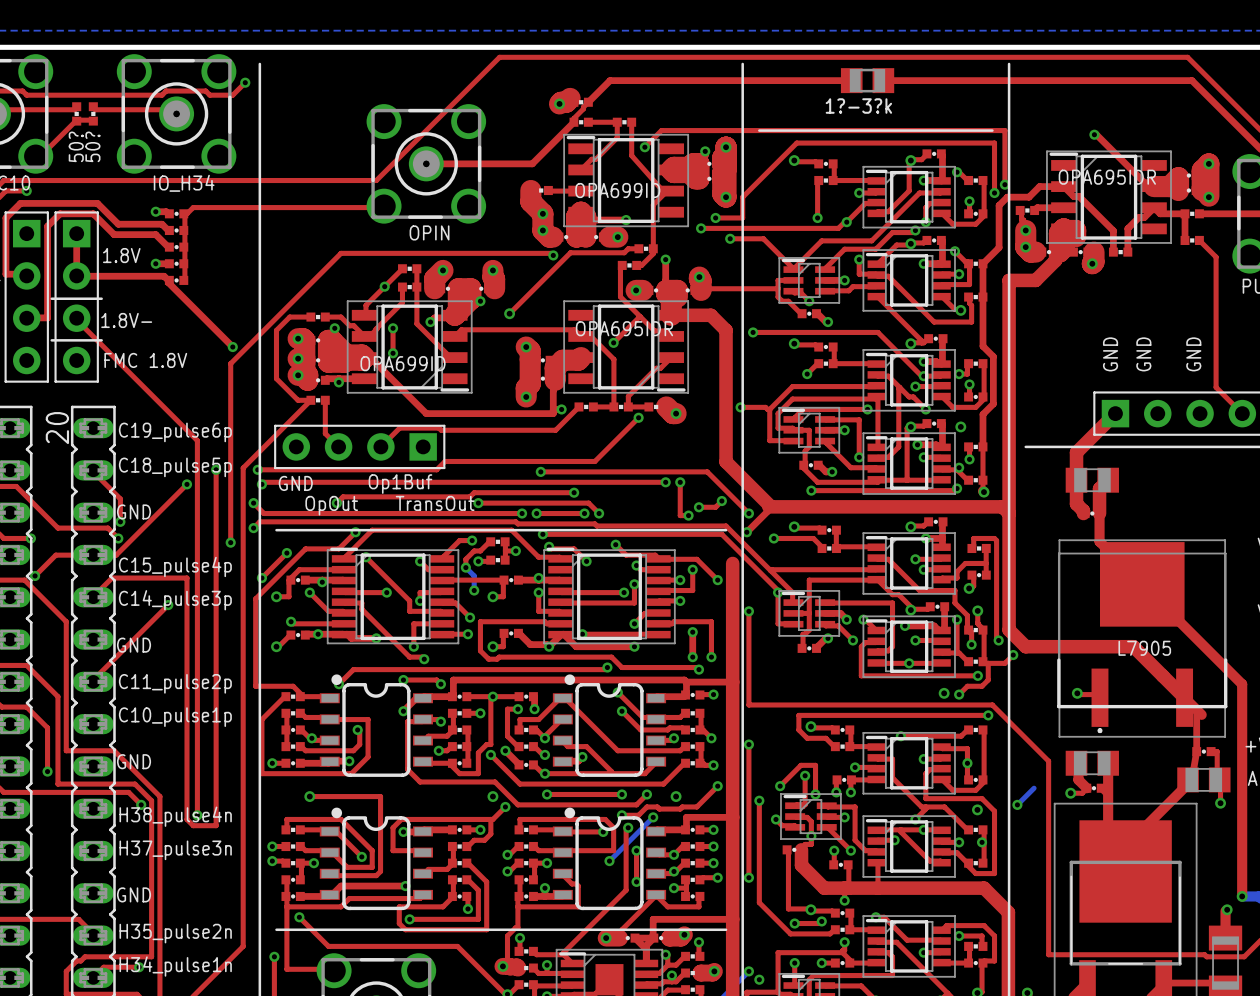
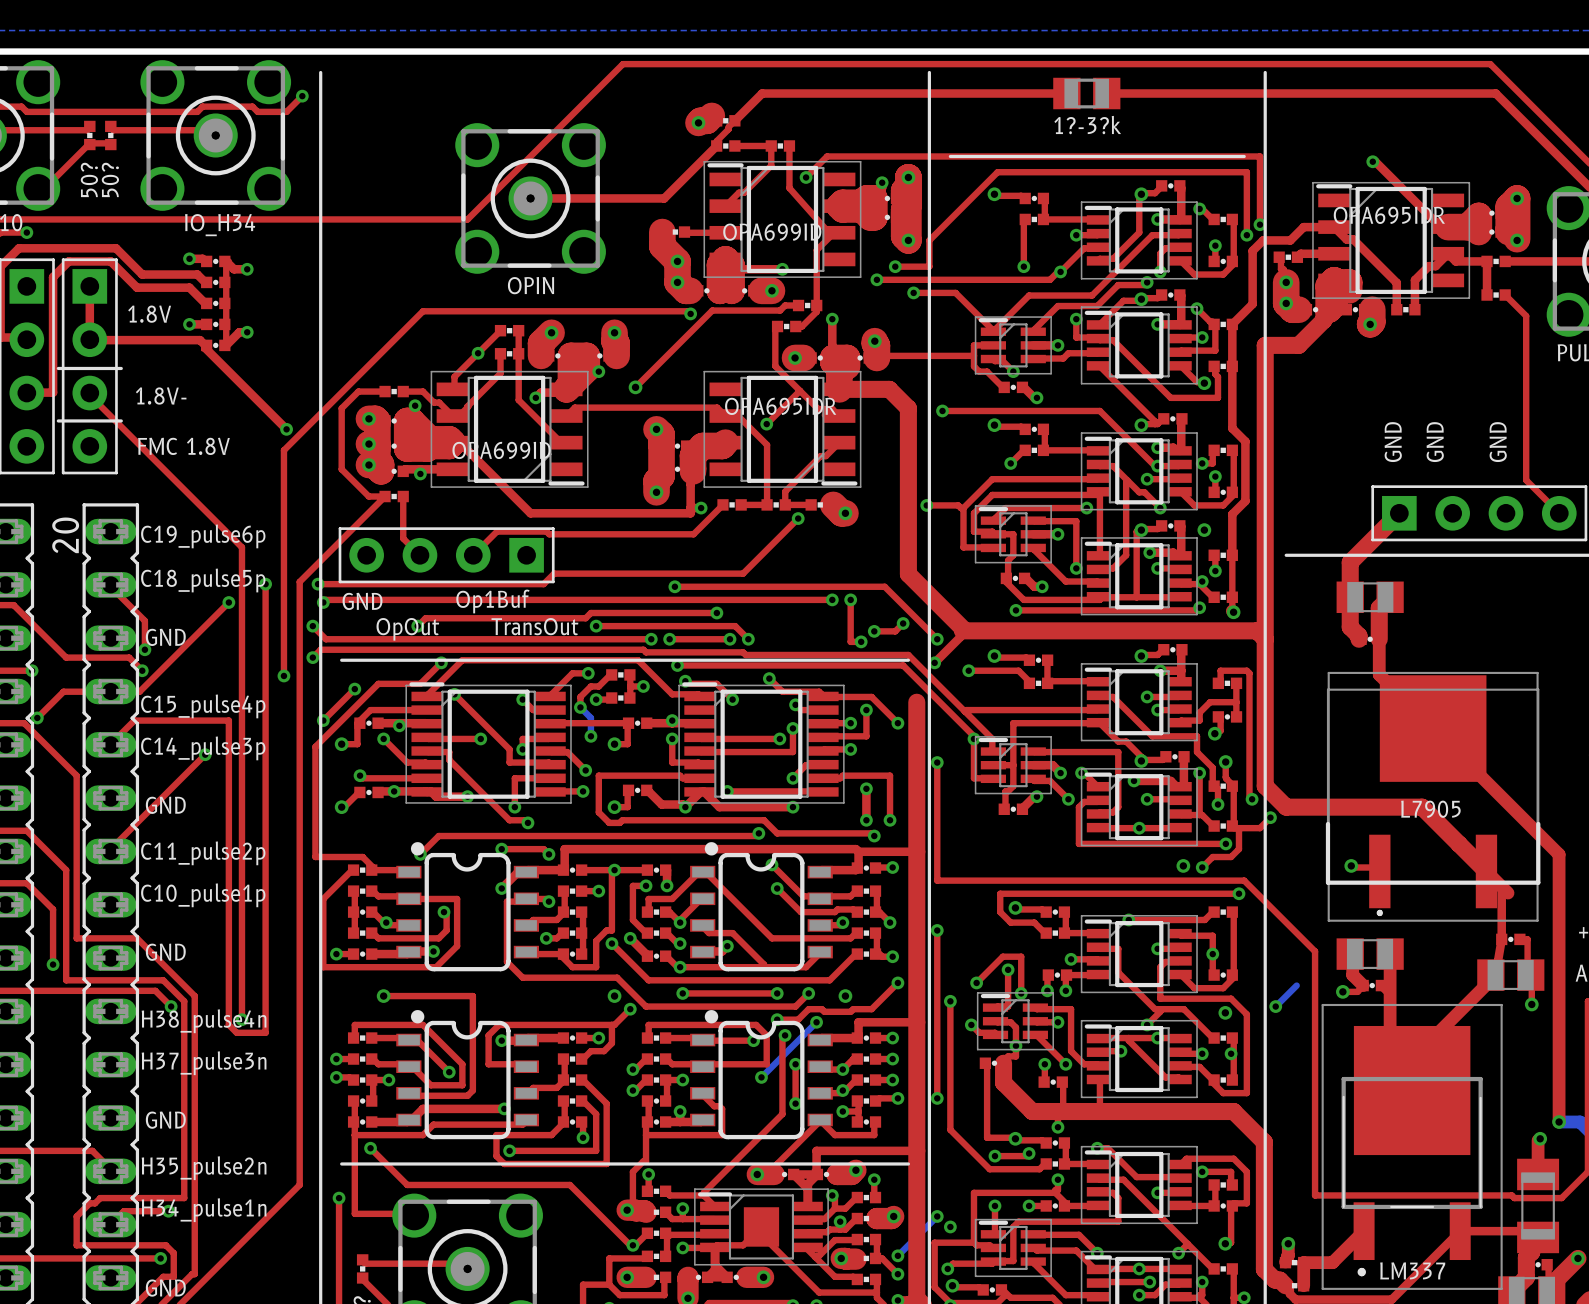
top track: (384, 206) (193, 207) (187, 213) -> none
top track: none -> (226, 261) (234, 269) (247, 269)
via: none -> (247, 269)
top track: none -> (247, 332) (239, 332) (226, 345)
via: none -> (247, 332)
top track: (393, 328) (393, 353) -> none
via: (393, 328) -> none
via: (393, 353) -> none

